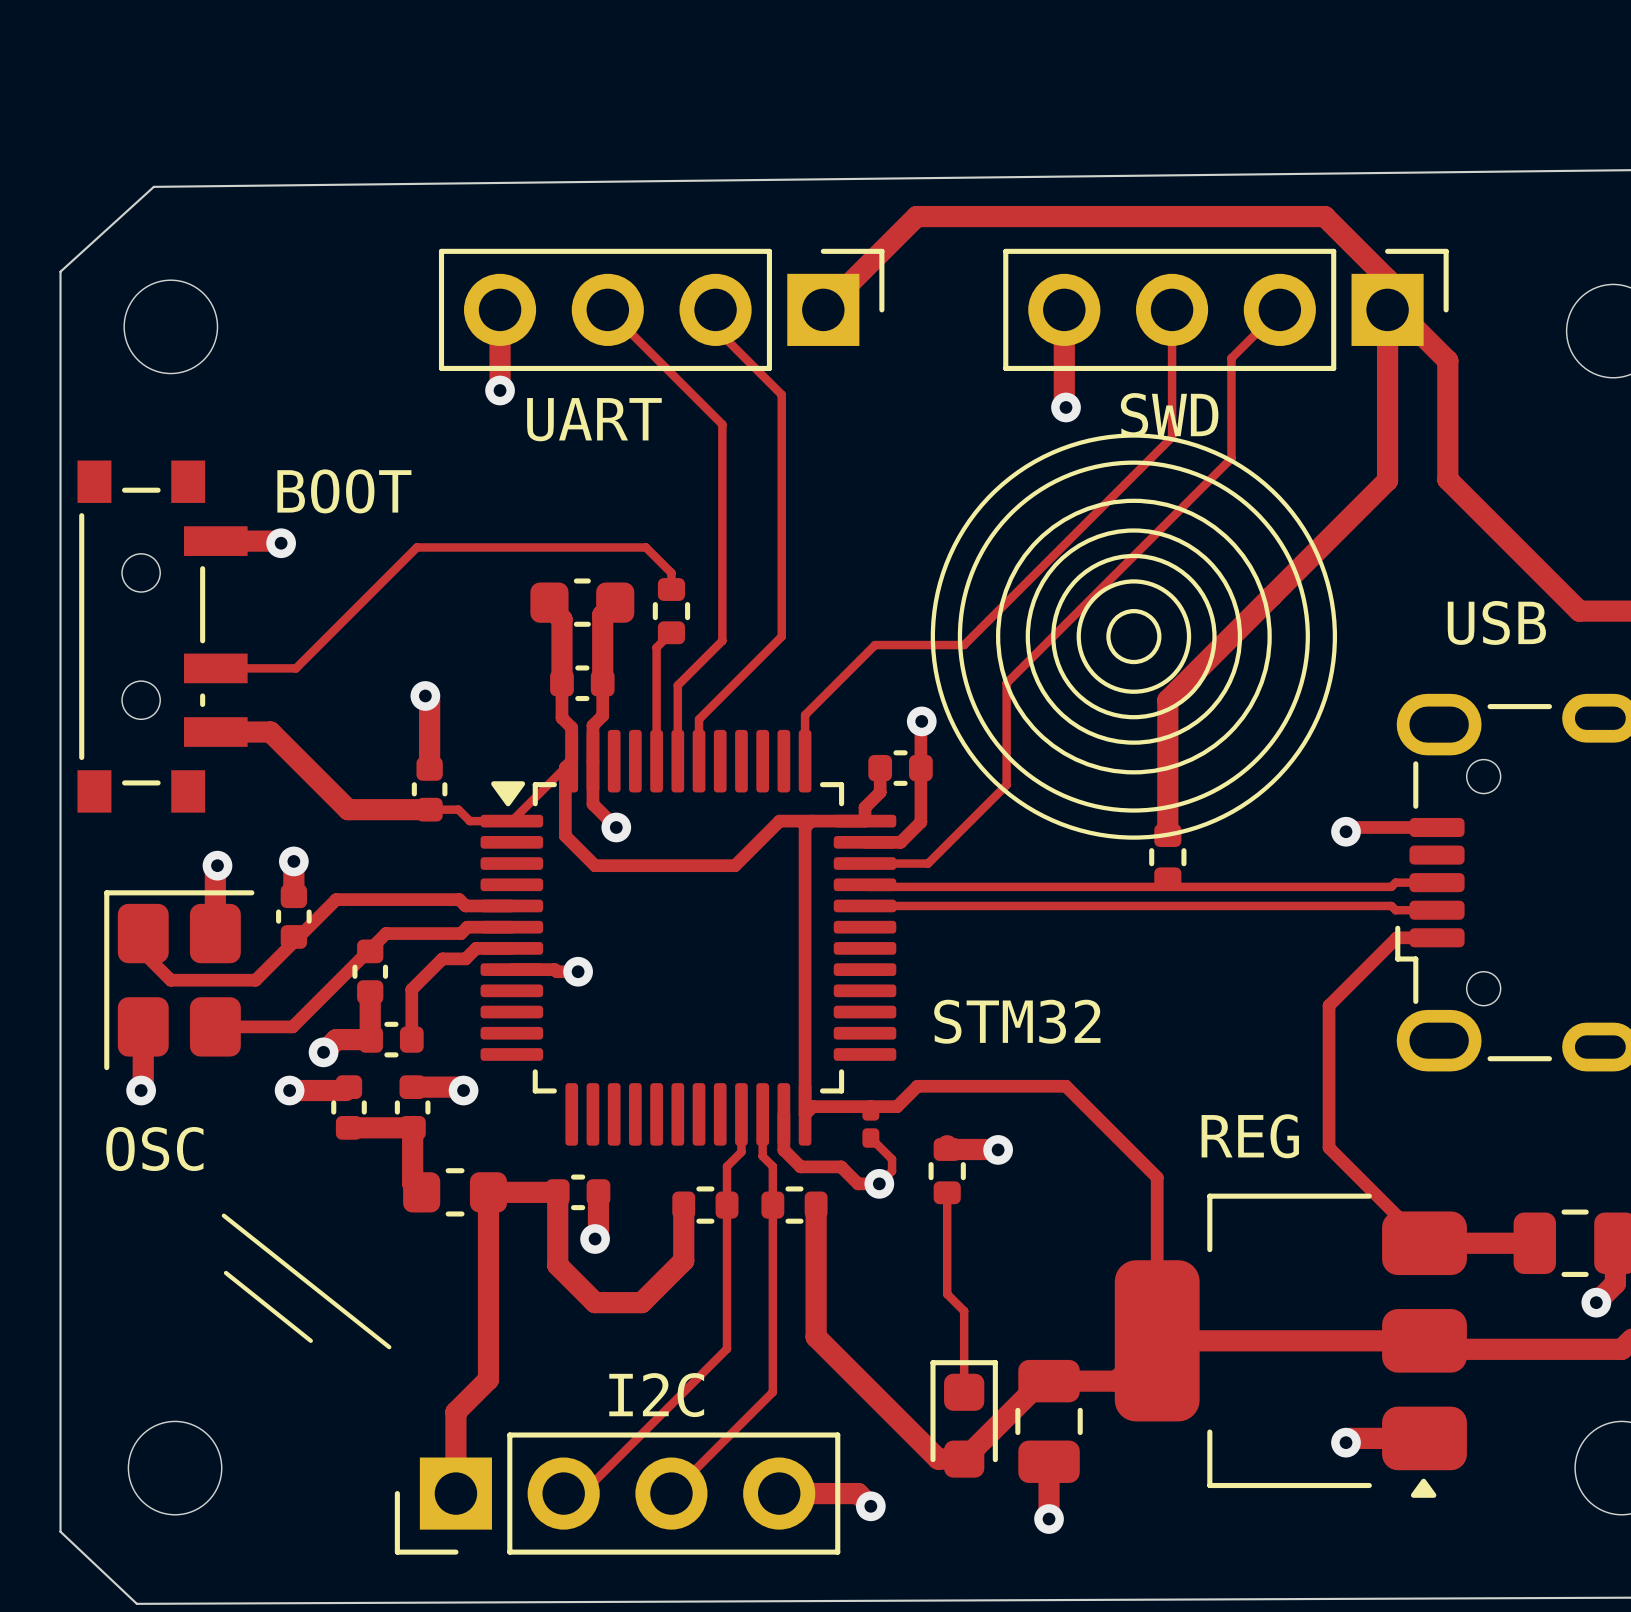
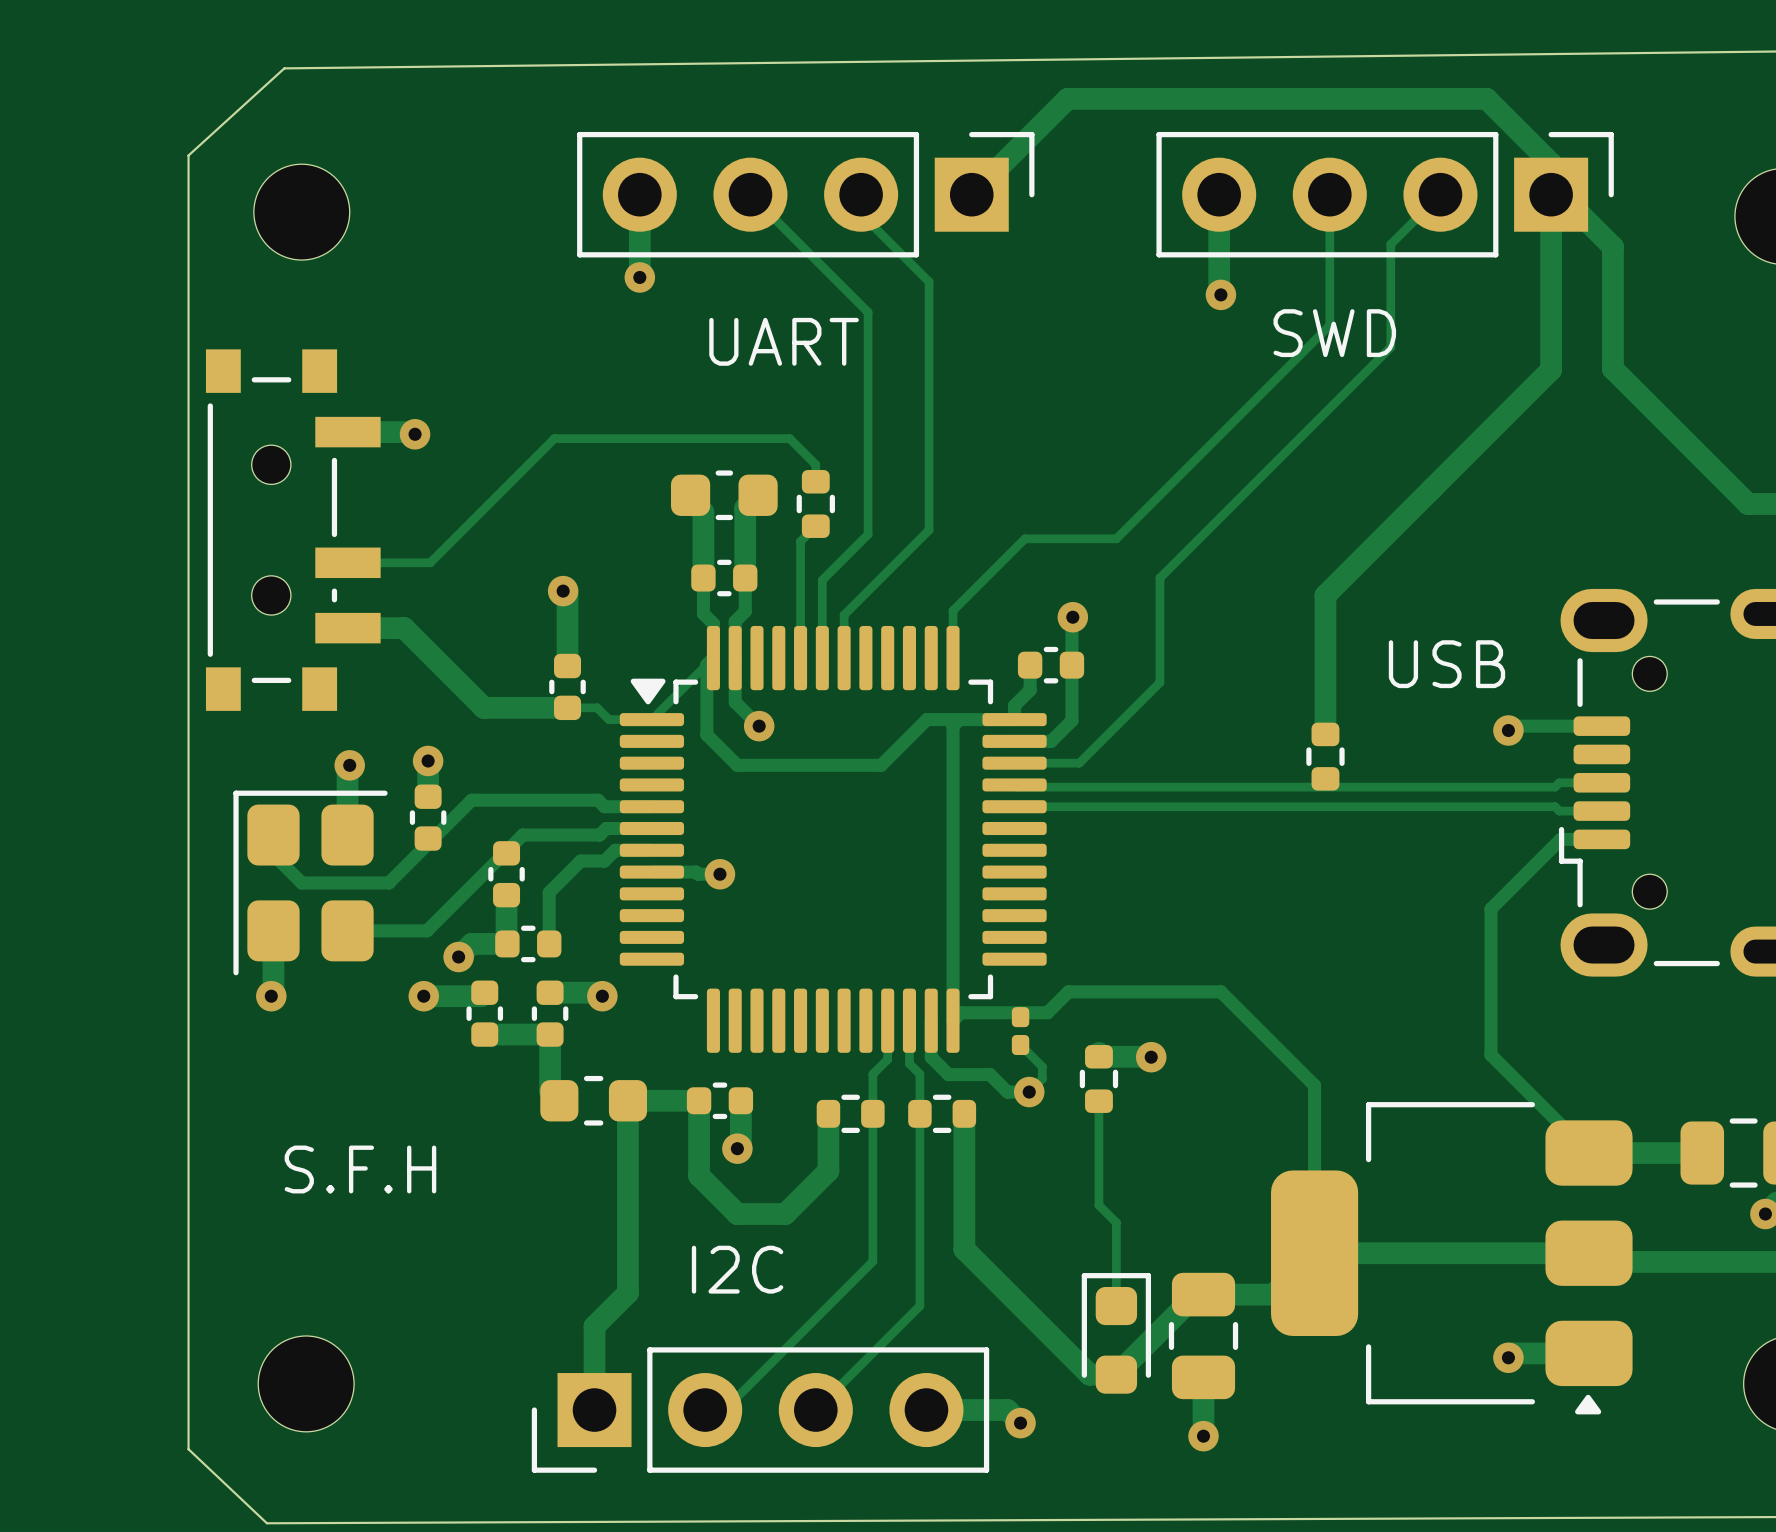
text position: SWD (1169, 415) -> SWD (1334, 333)
text position: UART (594, 419) -> UART (784, 341)
drawing: [930, 433, 1338, 840] -> none
text: BOOT (344, 491) -> none
text position: USB (1496, 622) -> USB (1446, 664)
text: STM32 (1017, 1021) -> none
text: REG (1250, 1136) -> none
text: OSC (154, 1149) -> none
line: (223, 1215) (389, 1347) -> none
text: none -> S.F.H (360, 1169)
line: (225, 1272) (310, 1340) -> none
text position: I2C (656, 1395) -> I2C (737, 1269)

